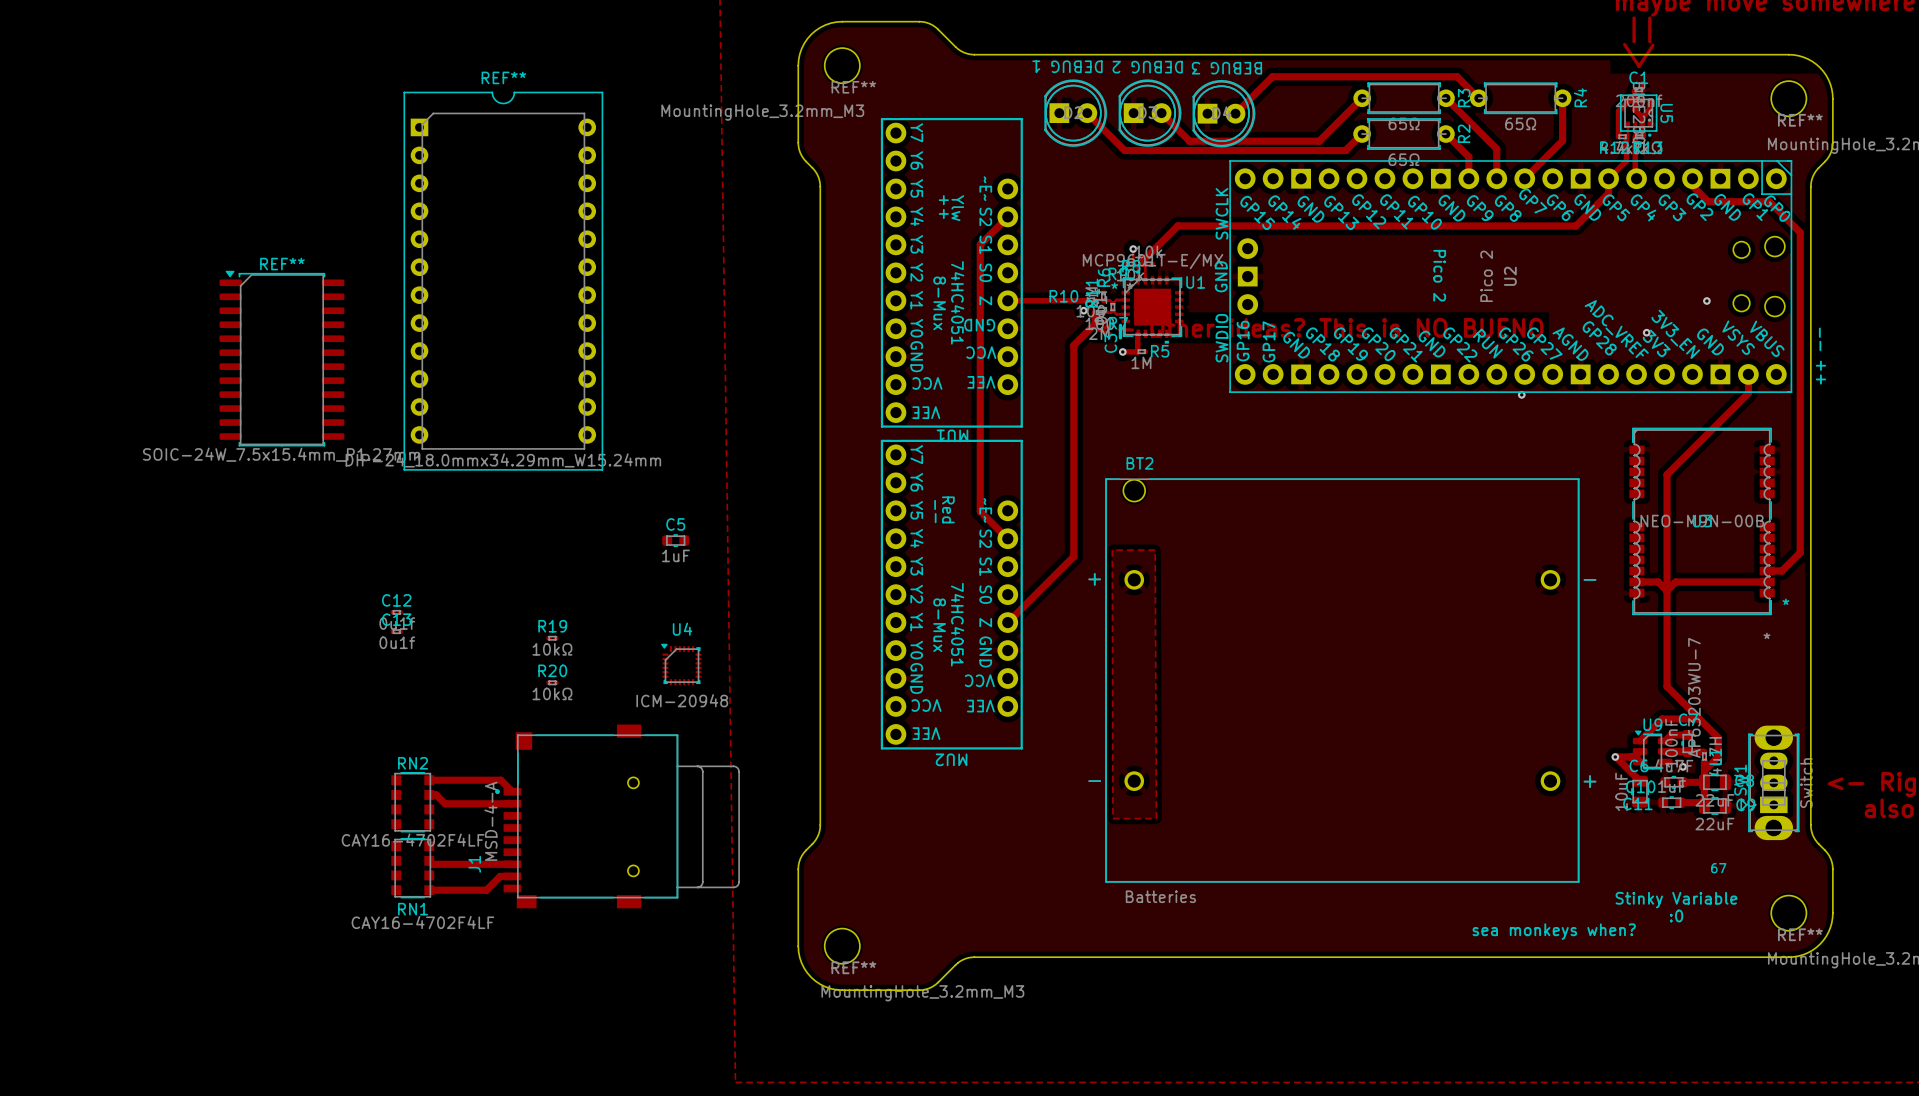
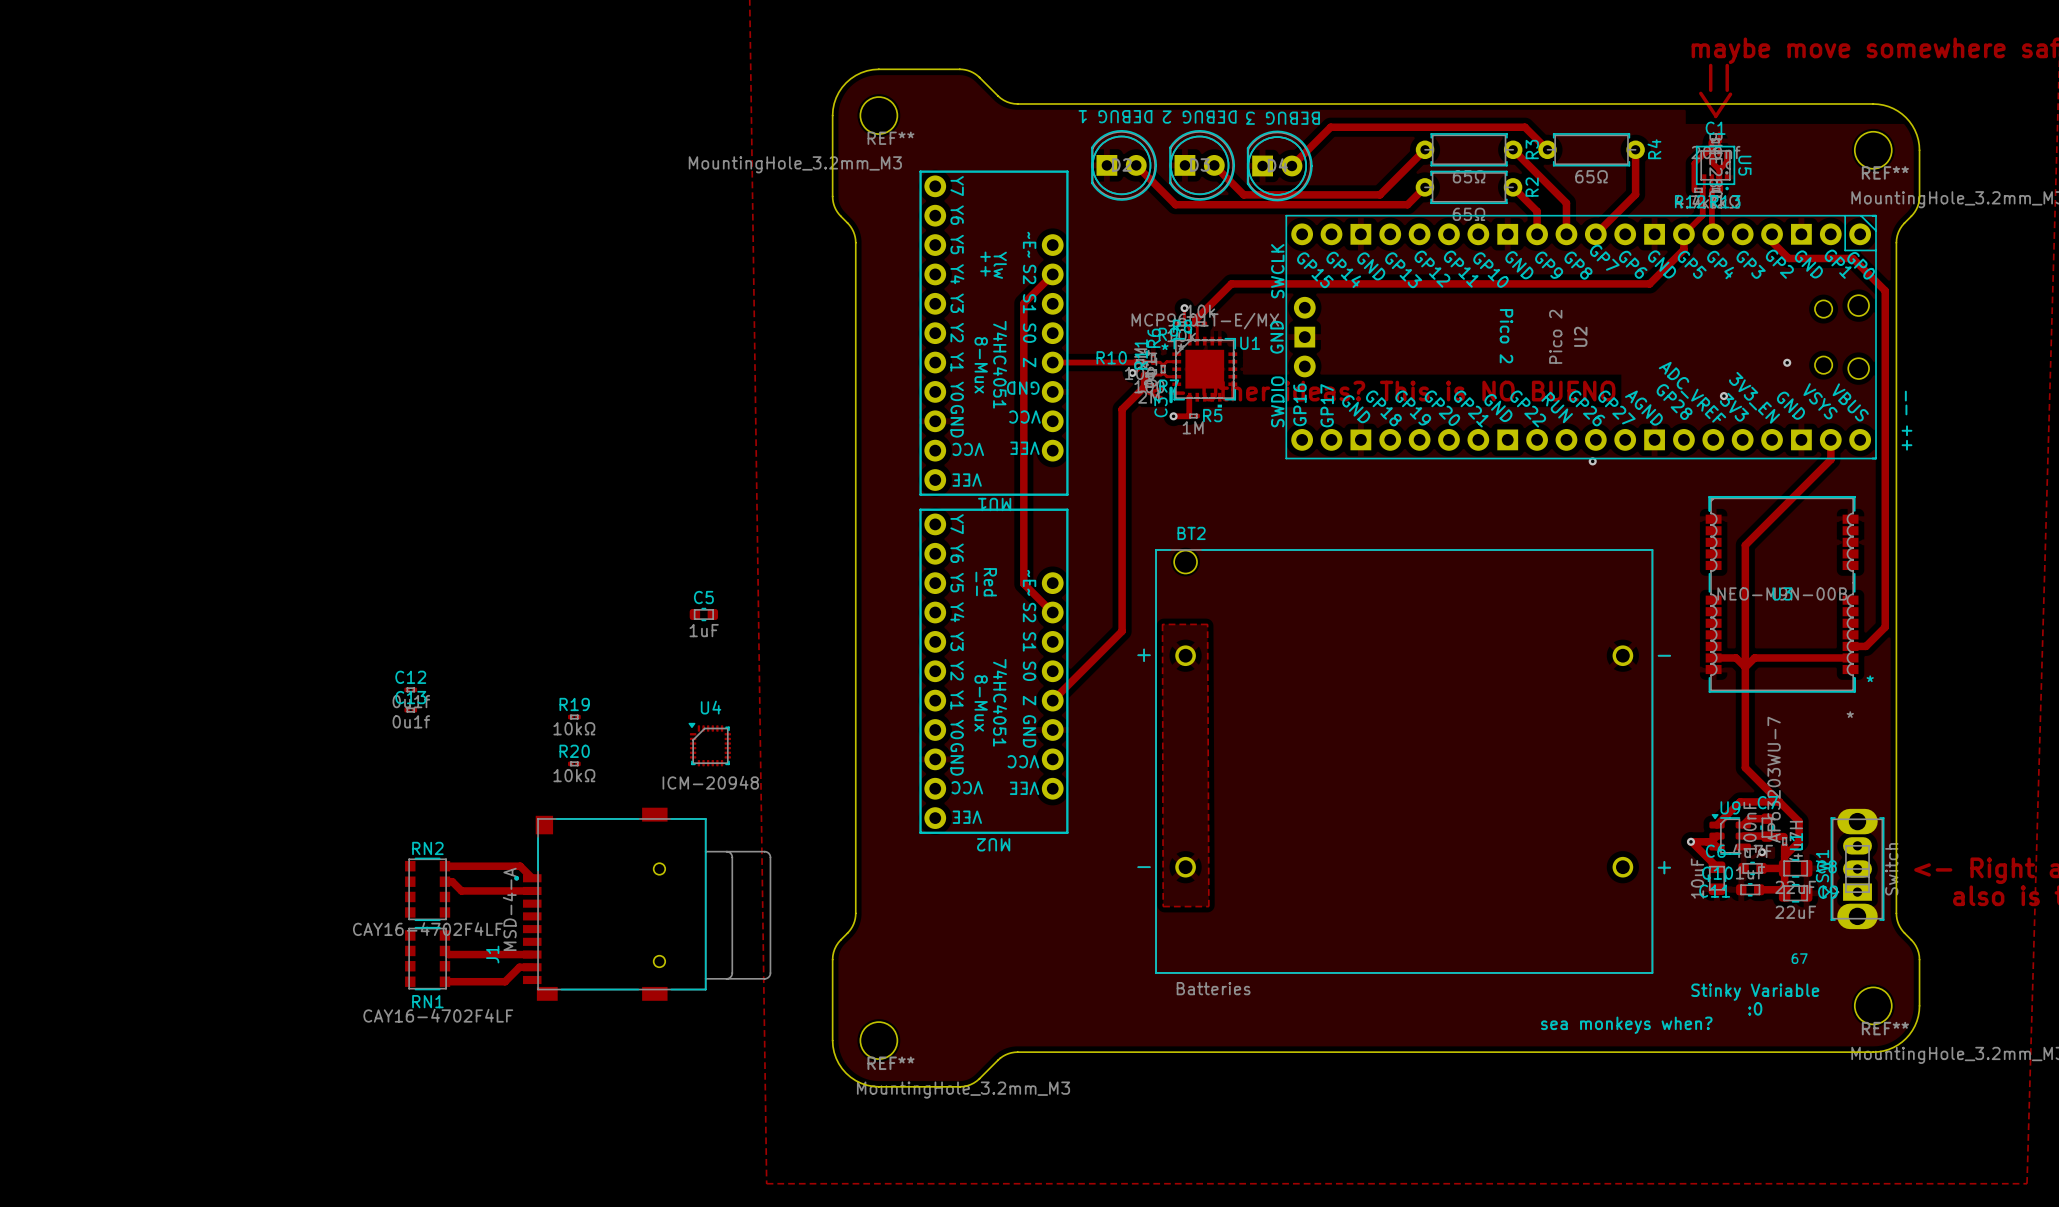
REF**: DIP-24_18.0mmx34.29mm_W15.24mm (503, 281) -> none
REF**: SOIC-24W_7.5x15.4mm_P1.27mm (281, 358) -> none

